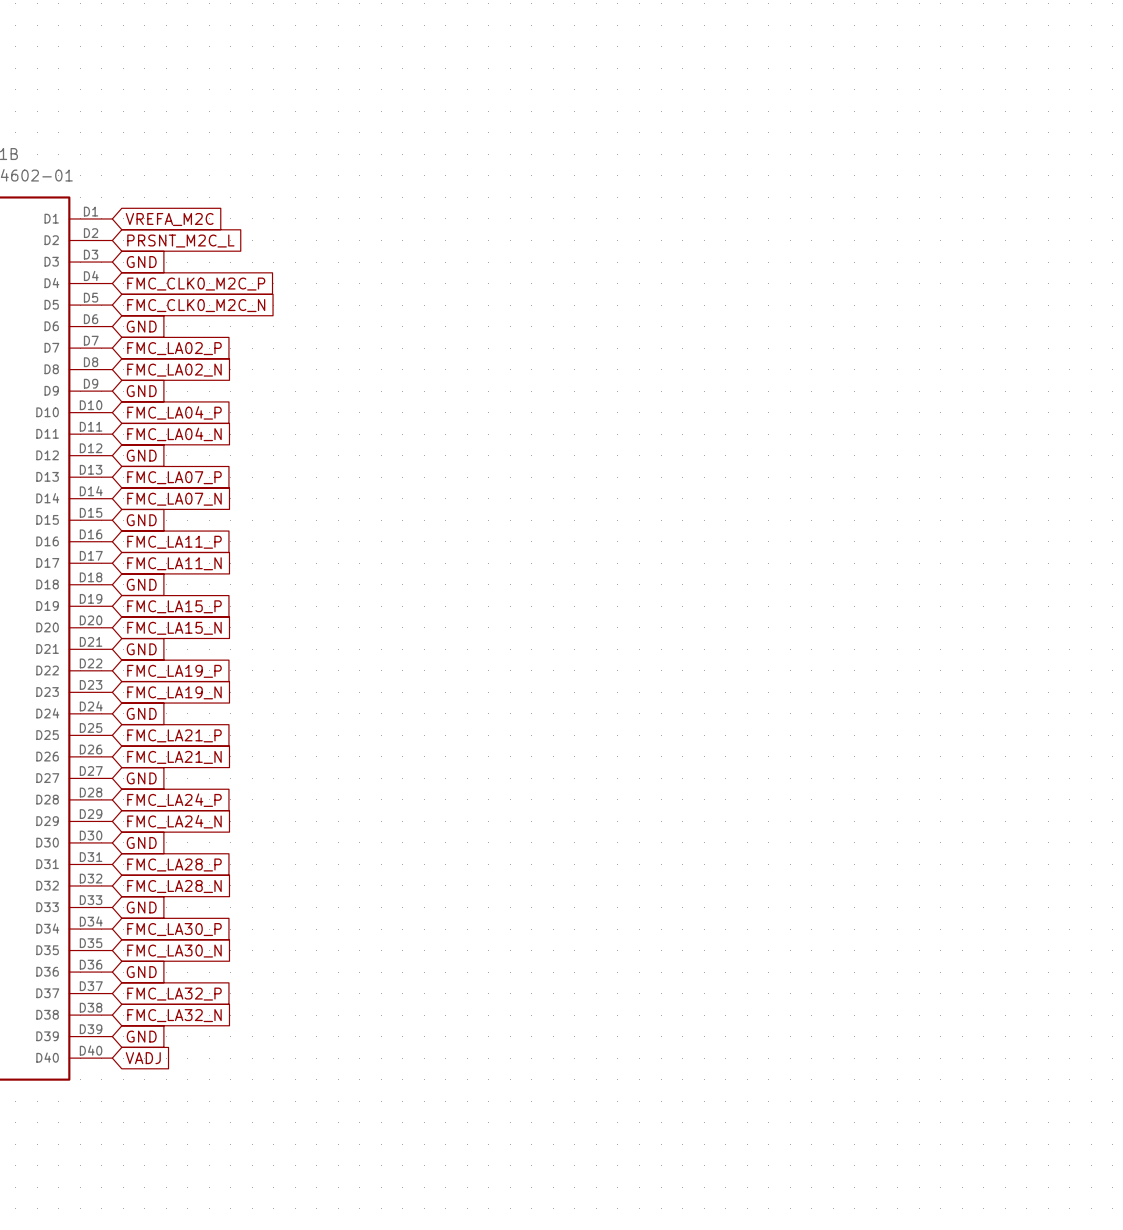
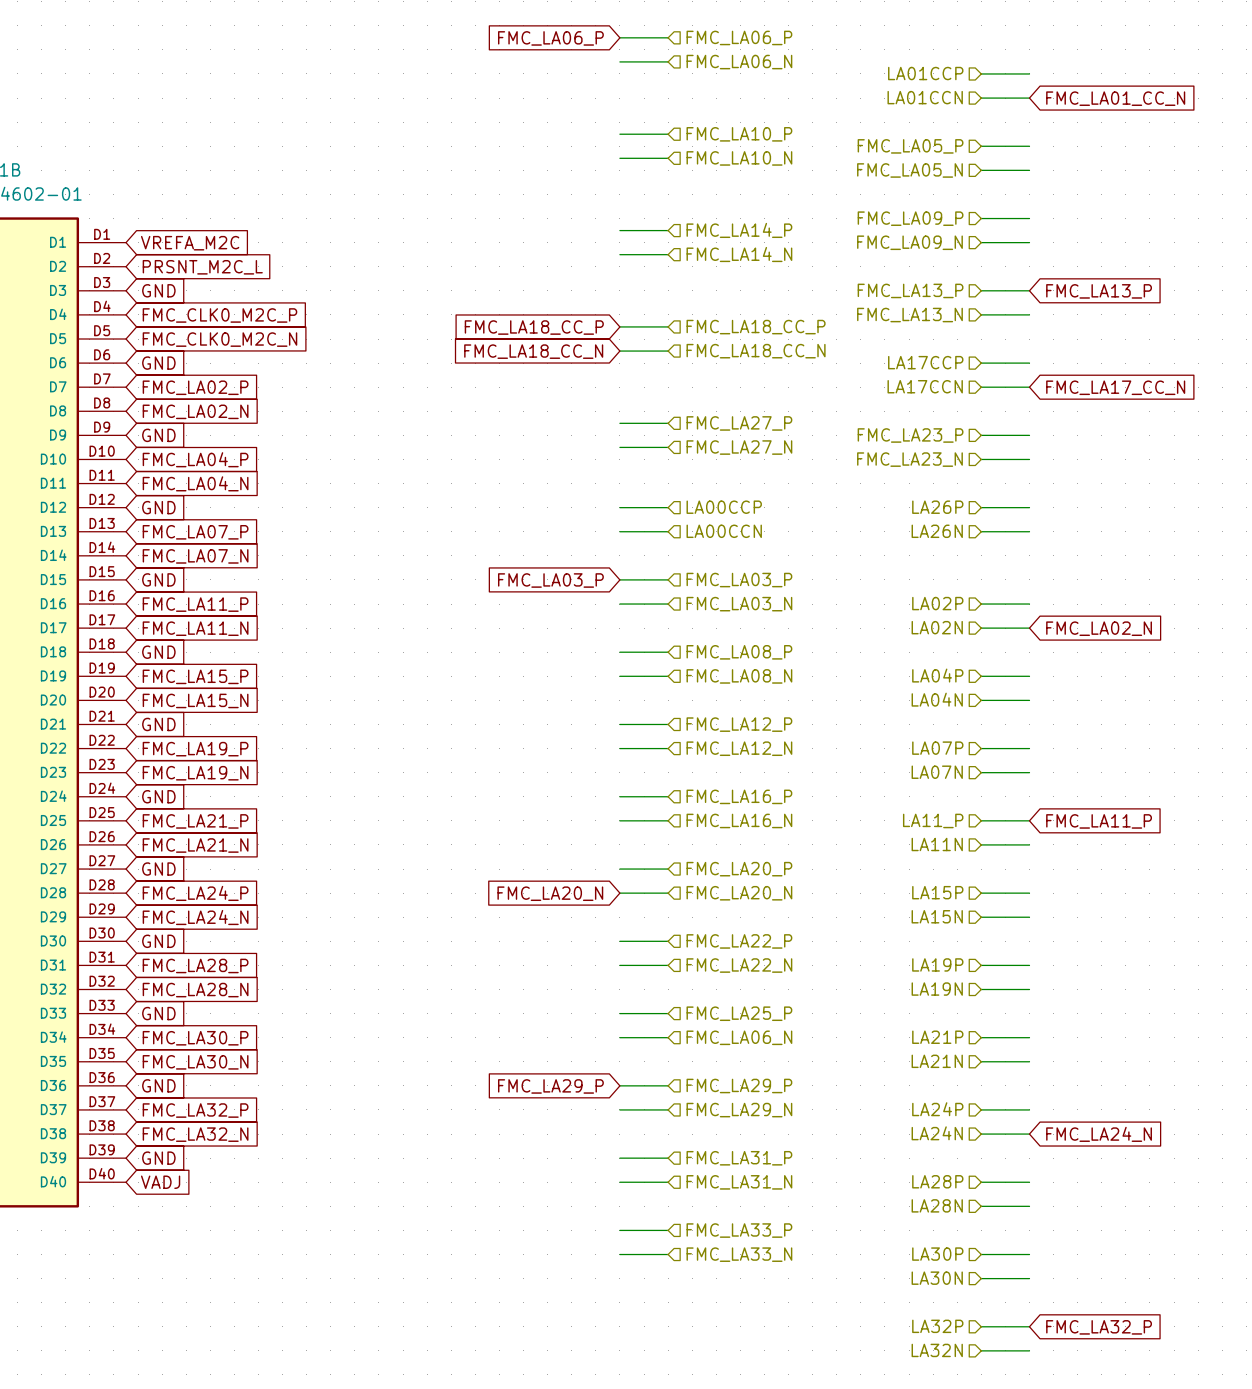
global label: none -> FMC_LA06_P (550, 38)
wire: none -> (619, 37) (668, 37)
hierarchical label: none -> FMC_LA06_P (739, 37)
wire: none -> (619, 61) (668, 61)
hierarchical label: none -> FMC_LA06_N (739, 62)
hierarchical label: none -> LA01CCP (925, 73)
wire: none -> (981, 73) (1029, 73)
hierarchical label: none -> LA01CCN (925, 97)
wire: none -> (981, 98) (1029, 98)
global label: none -> FMC_LA01_CC_N (1115, 98)
wire: none -> (619, 134) (668, 134)
hierarchical label: none -> FMC_LA10_P (739, 134)
wire: none -> (981, 146) (1029, 146)
hierarchical label: none -> FMC_LA05_P (910, 146)
wire: none -> (619, 158) (668, 158)
hierarchical label: none -> FMC_LA10_N (739, 158)
hierarchical label: none -> FMC_LA05_N (909, 170)
wire: none -> (981, 170) (1029, 170)
hierarchical label: none -> FMC_LA09_P (910, 218)
wire: none -> (981, 218) (1029, 218)
wire: none -> (619, 230) (668, 230)
hierarchical label: none -> FMC_LA14_P (739, 230)
wire: none -> (981, 242) (1029, 242)
hierarchical label: none -> FMC_LA09_N (909, 242)
wire: none -> (619, 254) (668, 254)
hierarchical label: none -> FMC_LA14_N (739, 254)
hierarchical label: none -> FMC_LA13_P (910, 290)
wire: none -> (981, 290) (1029, 290)
global label: none -> FMC_LA13_P (1099, 291)
hierarchical label: none -> FMC_LA13_N (909, 315)
wire: none -> (981, 314) (1029, 314)
global label: none -> FMC_LA18_CC_P (534, 327)
wire: none -> (619, 326) (668, 326)
hierarchical label: none -> FMC_LA18_CC_P (756, 327)
wire: none -> (619, 351) (668, 351)
hierarchical label: none -> FMC_LA18_CC_N (756, 351)
global label: none -> FMC_LA18_CC_N (533, 351)
hierarchical label: none -> LA17CCP (925, 362)
wire: none -> (981, 363) (1029, 363)
hierarchical label: none -> LA17CCN (925, 386)
wire: none -> (981, 387) (1029, 387)
global label: none -> FMC_LA17_CC_N (1115, 387)
wire: none -> (619, 423) (668, 423)
hierarchical label: none -> FMC_LA27_P (739, 423)
hierarchical label: none -> FMC_LA23_P (910, 435)
wire: none -> (981, 435) (1029, 435)
wire: none -> (619, 447) (668, 447)
hierarchical label: none -> FMC_LA27_N (739, 447)
hierarchical label: none -> FMC_LA23_N (909, 459)
wire: none -> (981, 459) (1029, 459)
wire: none -> (619, 507) (668, 507)
hierarchical label: none -> LA00CCP (724, 507)
hierarchical label: none -> LA26P (937, 507)
wire: none -> (981, 507) (1029, 507)
hierarchical label: none -> LA00CCN (724, 531)
hierarchical label: none -> LA26N (937, 531)
wire: none -> (619, 531) (668, 531)
wire: none -> (981, 531) (1029, 531)
global label: none -> FMC_LA03_P (550, 580)
wire: none -> (619, 579) (668, 579)
hierarchical label: none -> FMC_LA03_P (739, 580)
wire: none -> (619, 604) (668, 604)
hierarchical label: none -> FMC_LA03_N (739, 604)
hierarchical label: none -> LA02P (937, 603)
wire: none -> (981, 604) (1029, 604)
hierarchical label: none -> LA02N (937, 627)
wire: none -> (981, 628) (1029, 628)
global label: none -> FMC_LA02_N (1099, 628)
wire: none -> (619, 652) (668, 652)
hierarchical label: none -> FMC_LA08_P (739, 652)
hierarchical label: none -> LA04P (937, 675)
wire: none -> (619, 676) (668, 676)
hierarchical label: none -> FMC_LA08_N (739, 676)
wire: none -> (981, 676) (1029, 676)
hierarchical label: none -> LA04N (937, 699)
wire: none -> (981, 700) (1029, 700)
wire: none -> (619, 724) (668, 724)
hierarchical label: none -> FMC_LA12_P (739, 724)
wire: none -> (619, 748) (668, 748)
hierarchical label: none -> FMC_LA12_N (739, 748)
hierarchical label: none -> LA07P (937, 748)
wire: none -> (981, 748) (1029, 748)
hierarchical label: none -> LA07N (937, 772)
wire: none -> (981, 772) (1029, 772)
wire: none -> (619, 796) (668, 796)
hierarchical label: none -> FMC_LA16_P (739, 796)
wire: none -> (619, 820) (668, 820)
hierarchical label: none -> FMC_LA16_N (739, 820)
hierarchical label: none -> LA11_P (933, 820)
wire: none -> (981, 820) (1029, 820)
global label: none -> FMC_LA11_P (1099, 821)
hierarchical label: none -> LA11N (937, 844)
wire: none -> (981, 844) (1029, 844)
wire: none -> (619, 869) (668, 869)
hierarchical label: none -> FMC_LA20_P (739, 869)
wire: none -> (619, 893) (668, 893)
hierarchical label: none -> LA15P (937, 892)
wire: none -> (981, 893) (1029, 893)
global label: none -> FMC_LA20_N (550, 893)
hierarchical label: none -> FMC_LA20_N (739, 893)
hierarchical label: none -> LA15N (937, 916)
wire: none -> (981, 917) (1029, 917)
wire: none -> (619, 941) (668, 941)
hierarchical label: none -> FMC_LA22_P (739, 941)
wire: none -> (619, 965) (668, 965)
hierarchical label: none -> FMC_LA22_N (739, 965)
hierarchical label: none -> LA19P (937, 964)
wire: none -> (981, 965) (1029, 965)
hierarchical label: none -> LA19N (937, 989)
wire: none -> (981, 989) (1029, 989)
wire: none -> (619, 1013) (668, 1013)
hierarchical label: none -> FMC_LA25_P (739, 1013)
hierarchical label: none -> LA21P (937, 1037)
wire: none -> (619, 1037) (668, 1037)
hierarchical label: none -> FMC_LA06_N (739, 1037)
wire: none -> (981, 1037) (1029, 1037)
hierarchical label: none -> LA21N (937, 1061)
wire: none -> (981, 1061) (1029, 1061)
global label: none -> FMC_LA29_P (550, 1086)
wire: none -> (619, 1085) (668, 1085)
hierarchical label: none -> FMC_LA29_P (739, 1085)
hierarchical label: none -> LA24P (937, 1109)
wire: none -> (619, 1109) (668, 1109)
hierarchical label: none -> FMC_LA29_N (739, 1110)
wire: none -> (981, 1109) (1029, 1109)
hierarchical label: none -> LA24N (937, 1133)
wire: none -> (981, 1134) (1029, 1134)
global label: none -> FMC_LA24_N (1099, 1134)
wire: none -> (619, 1158) (668, 1158)
hierarchical label: none -> FMC_LA31_P (739, 1158)
hierarchical label: none -> LA28P (937, 1181)
wire: none -> (619, 1182) (668, 1182)
hierarchical label: none -> FMC_LA31_N (739, 1182)
wire: none -> (981, 1182) (1029, 1182)
hierarchical label: none -> LA28N (937, 1205)
wire: none -> (981, 1206) (1029, 1206)
wire: none -> (619, 1230) (668, 1230)
hierarchical label: none -> FMC_LA33_P (739, 1230)
wire: none -> (619, 1254) (668, 1254)
hierarchical label: none -> FMC_LA33_N (739, 1254)
hierarchical label: none -> LA30P (937, 1254)
wire: none -> (981, 1254) (1029, 1254)
hierarchical label: none -> LA30N (937, 1278)
wire: none -> (981, 1278) (1029, 1278)
hierarchical label: none -> LA32P (937, 1326)
wire: none -> (981, 1326) (1029, 1326)
global label: none -> FMC_LA32_P (1099, 1327)
hierarchical label: none -> LA32N (937, 1350)
wire: none -> (981, 1350) (1029, 1350)

